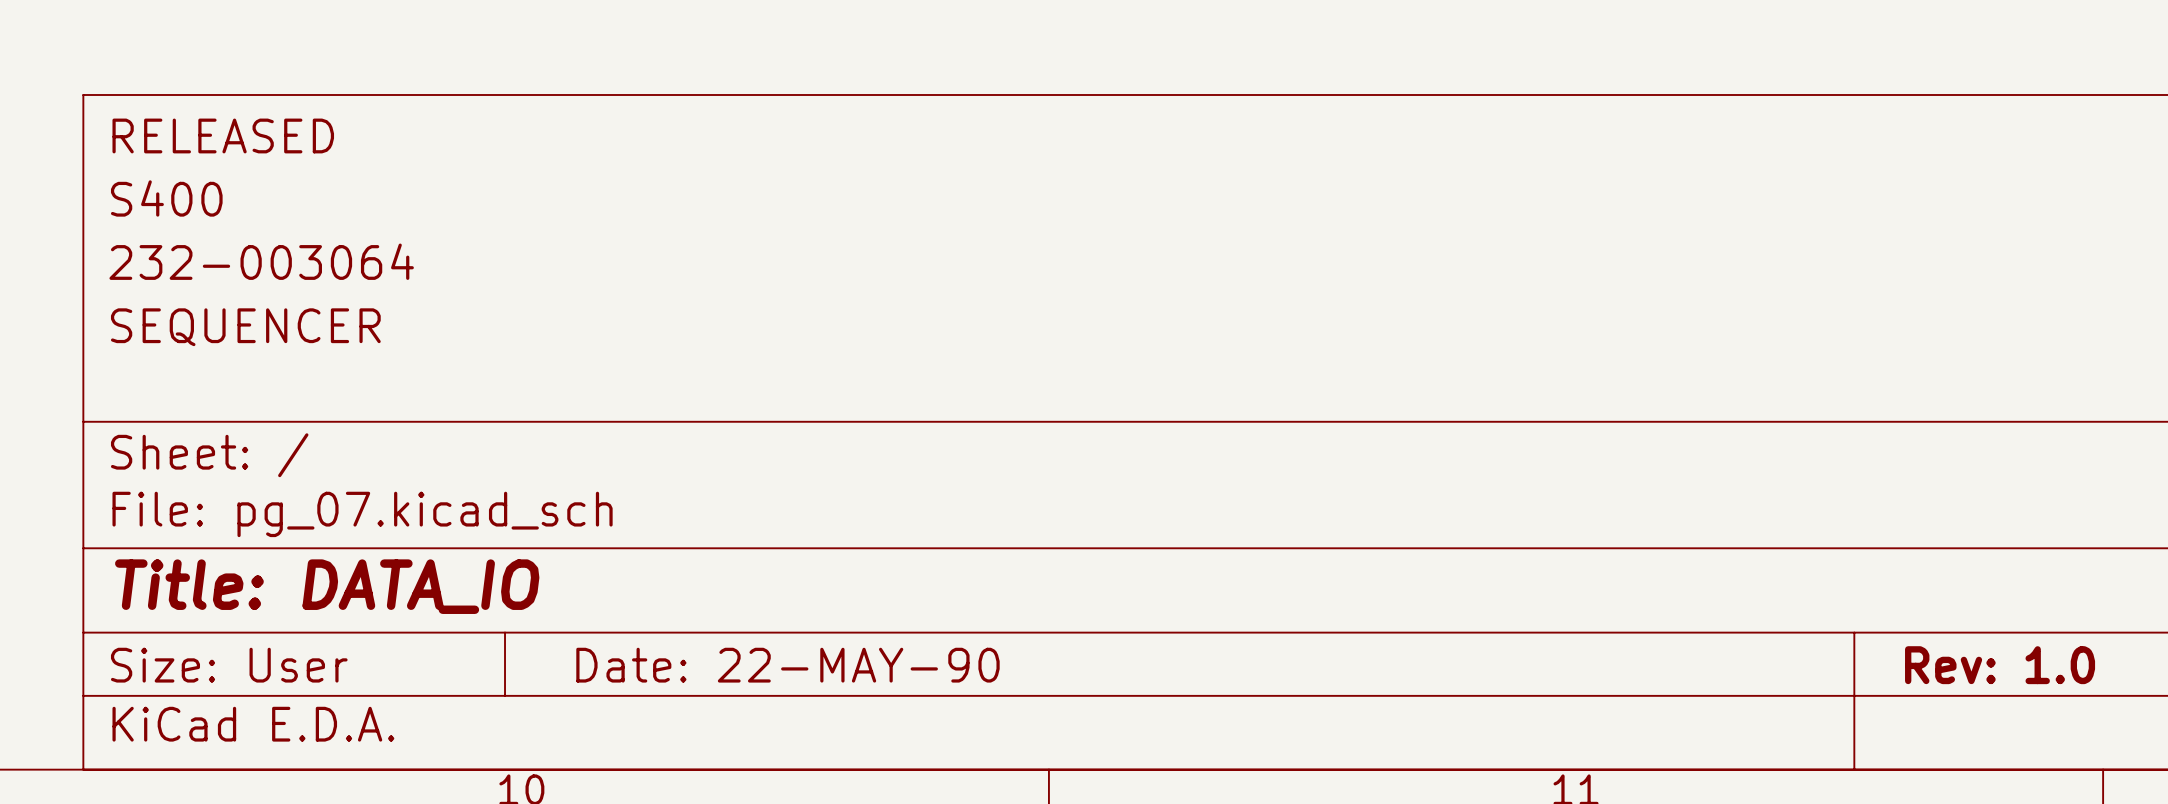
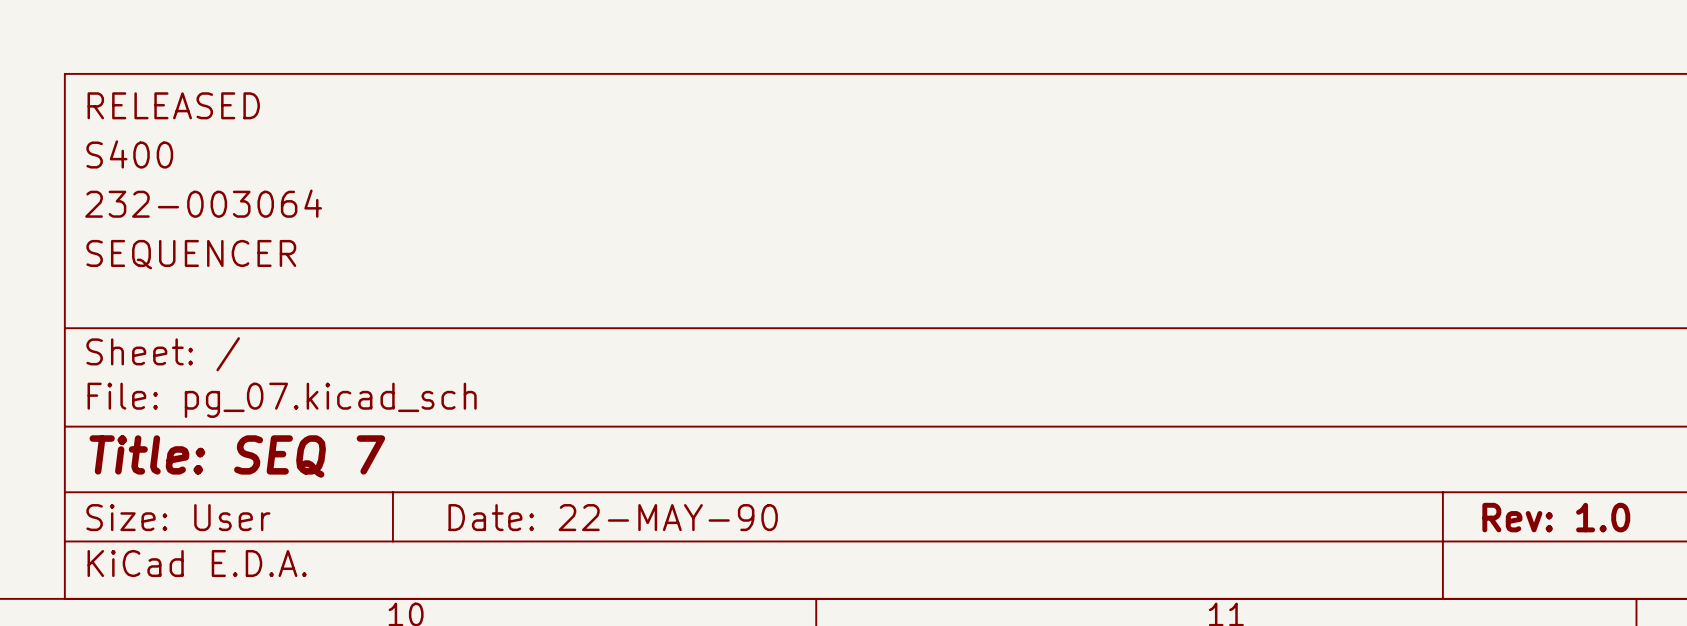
title block: Title: DATA_IO (327, 586) -> Title: SEQ 7 (237, 456)

